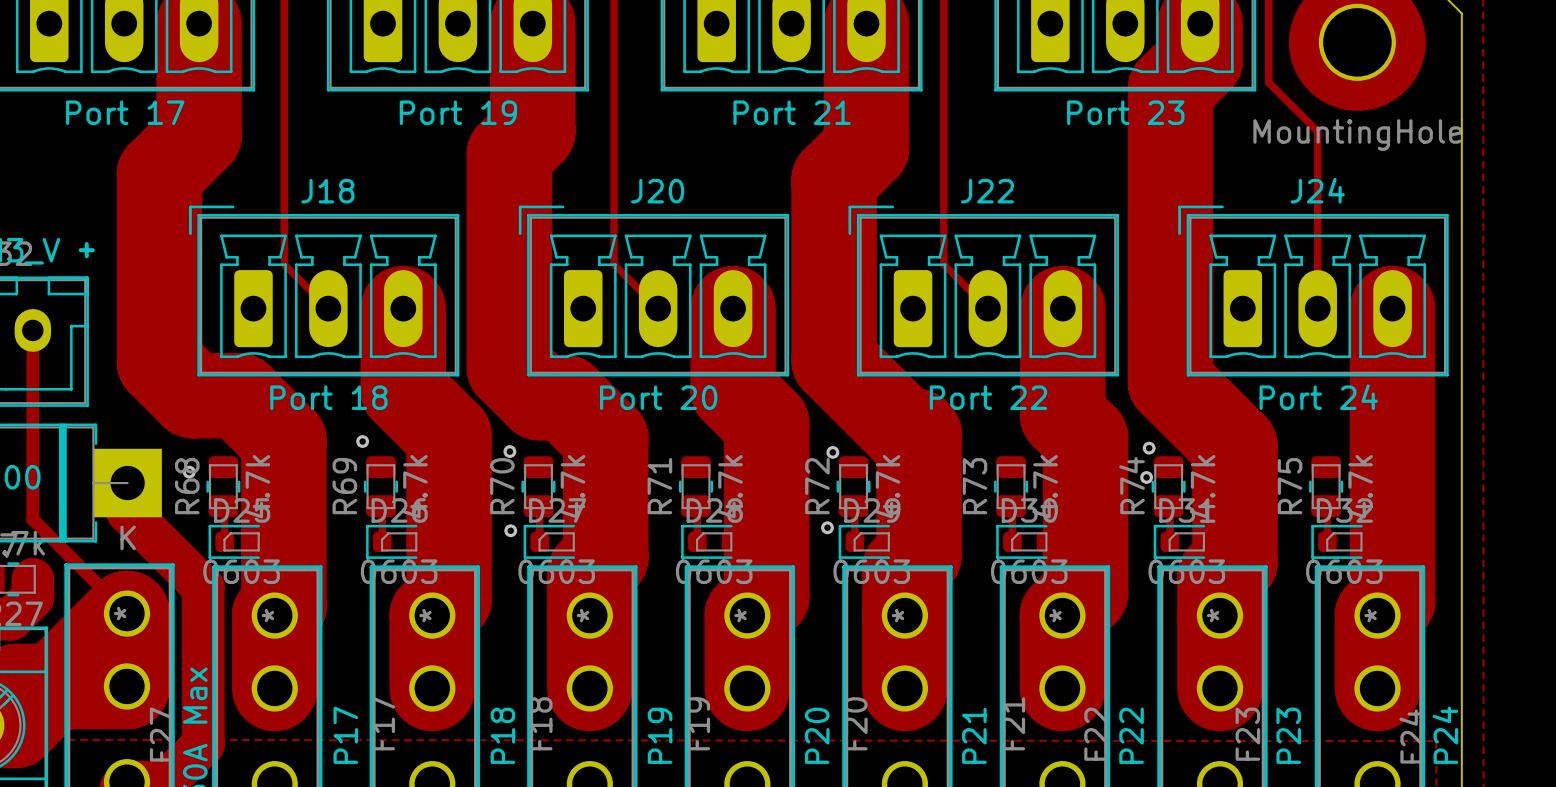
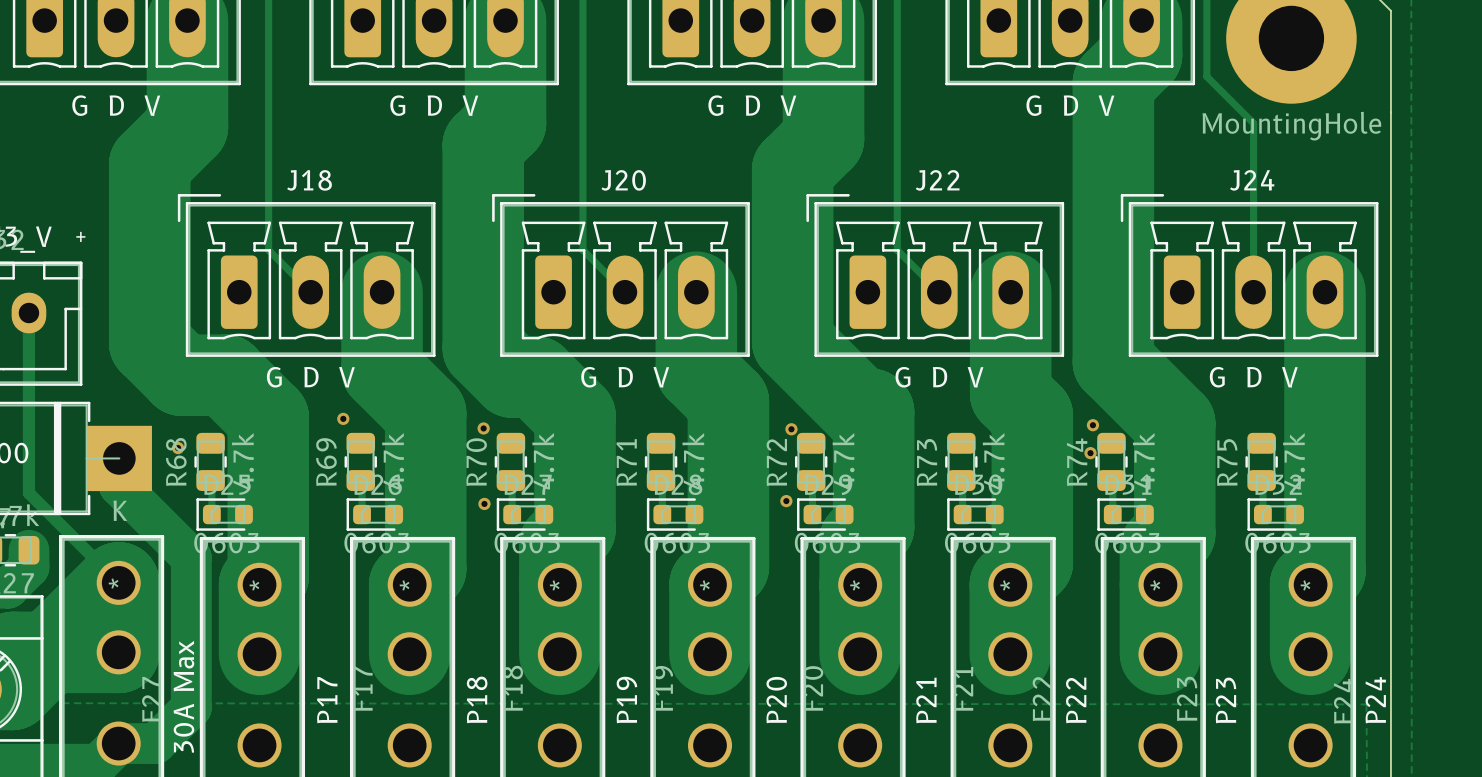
part value: Port 17 (125, 112) -> G D V (116, 105)
part value: Port 19 (458, 112) -> G D V (434, 105)
part value: Port 21 (792, 112) -> G D V (752, 105)
part value: Port 23 (1125, 112) -> G D V (1070, 105)
J18 value: Port 18 (328, 397) -> G D V (310, 377)
J20 value: Port 20 (658, 397) -> G D V (625, 377)
J22 value: Port 22 (988, 397) -> G D V (939, 377)
J24 value: Port 24 (1318, 397) -> G D V (1253, 377)

